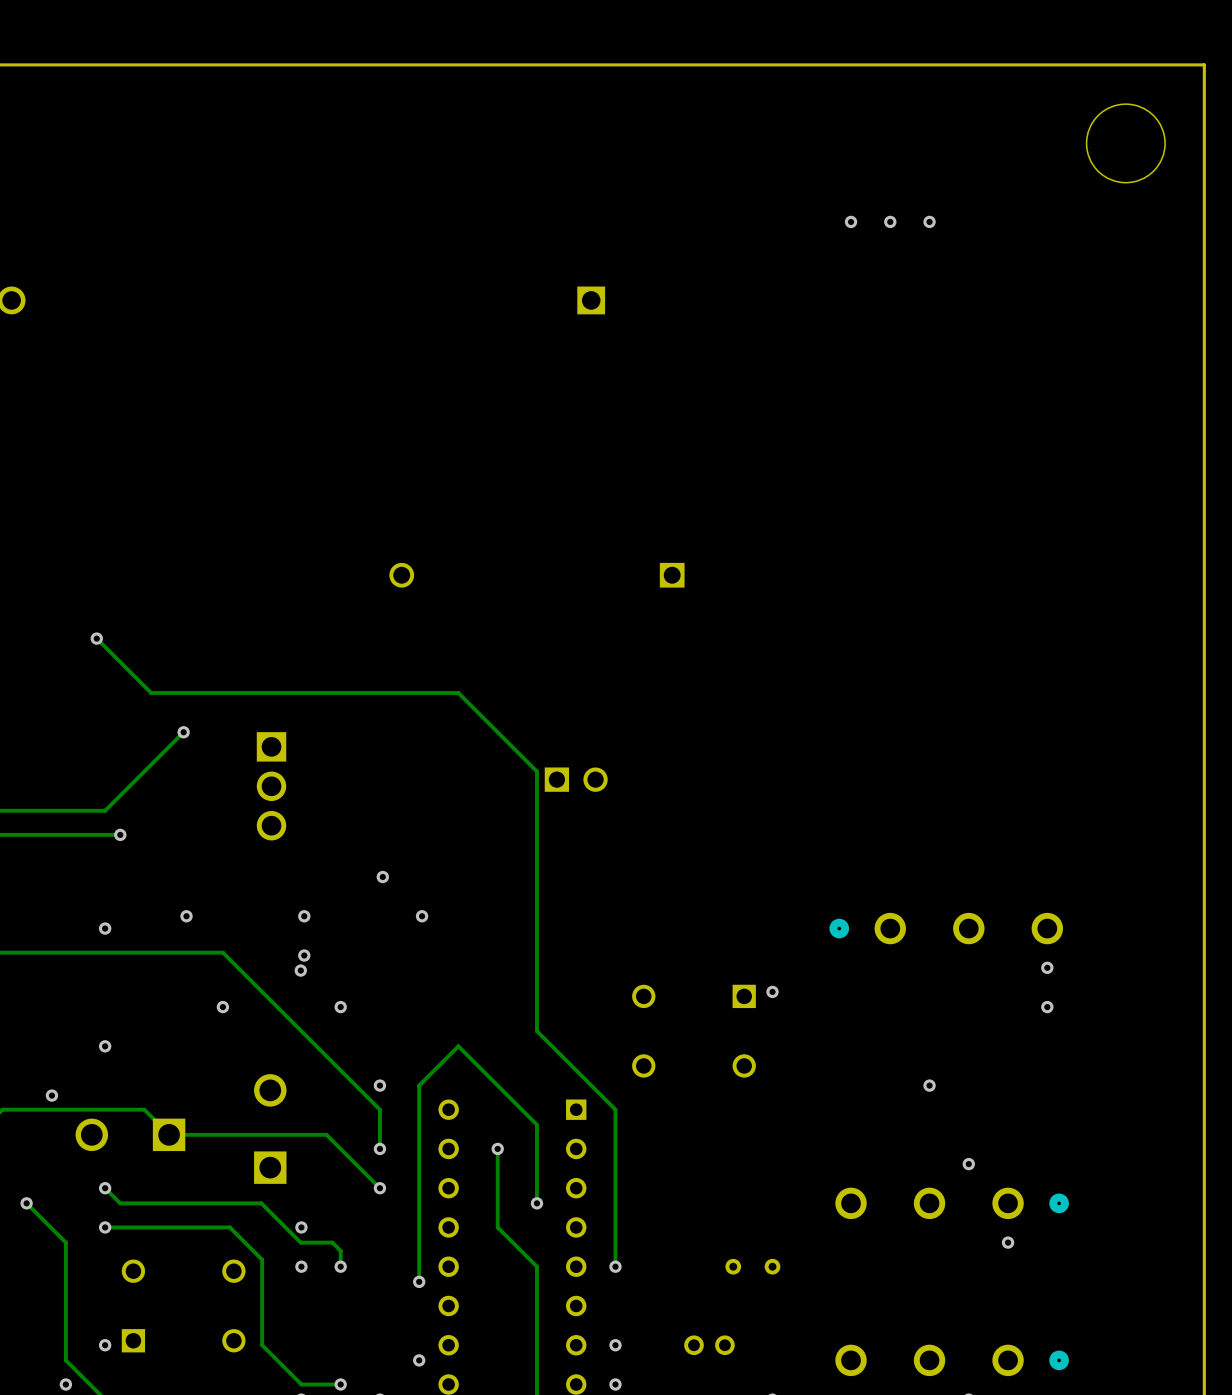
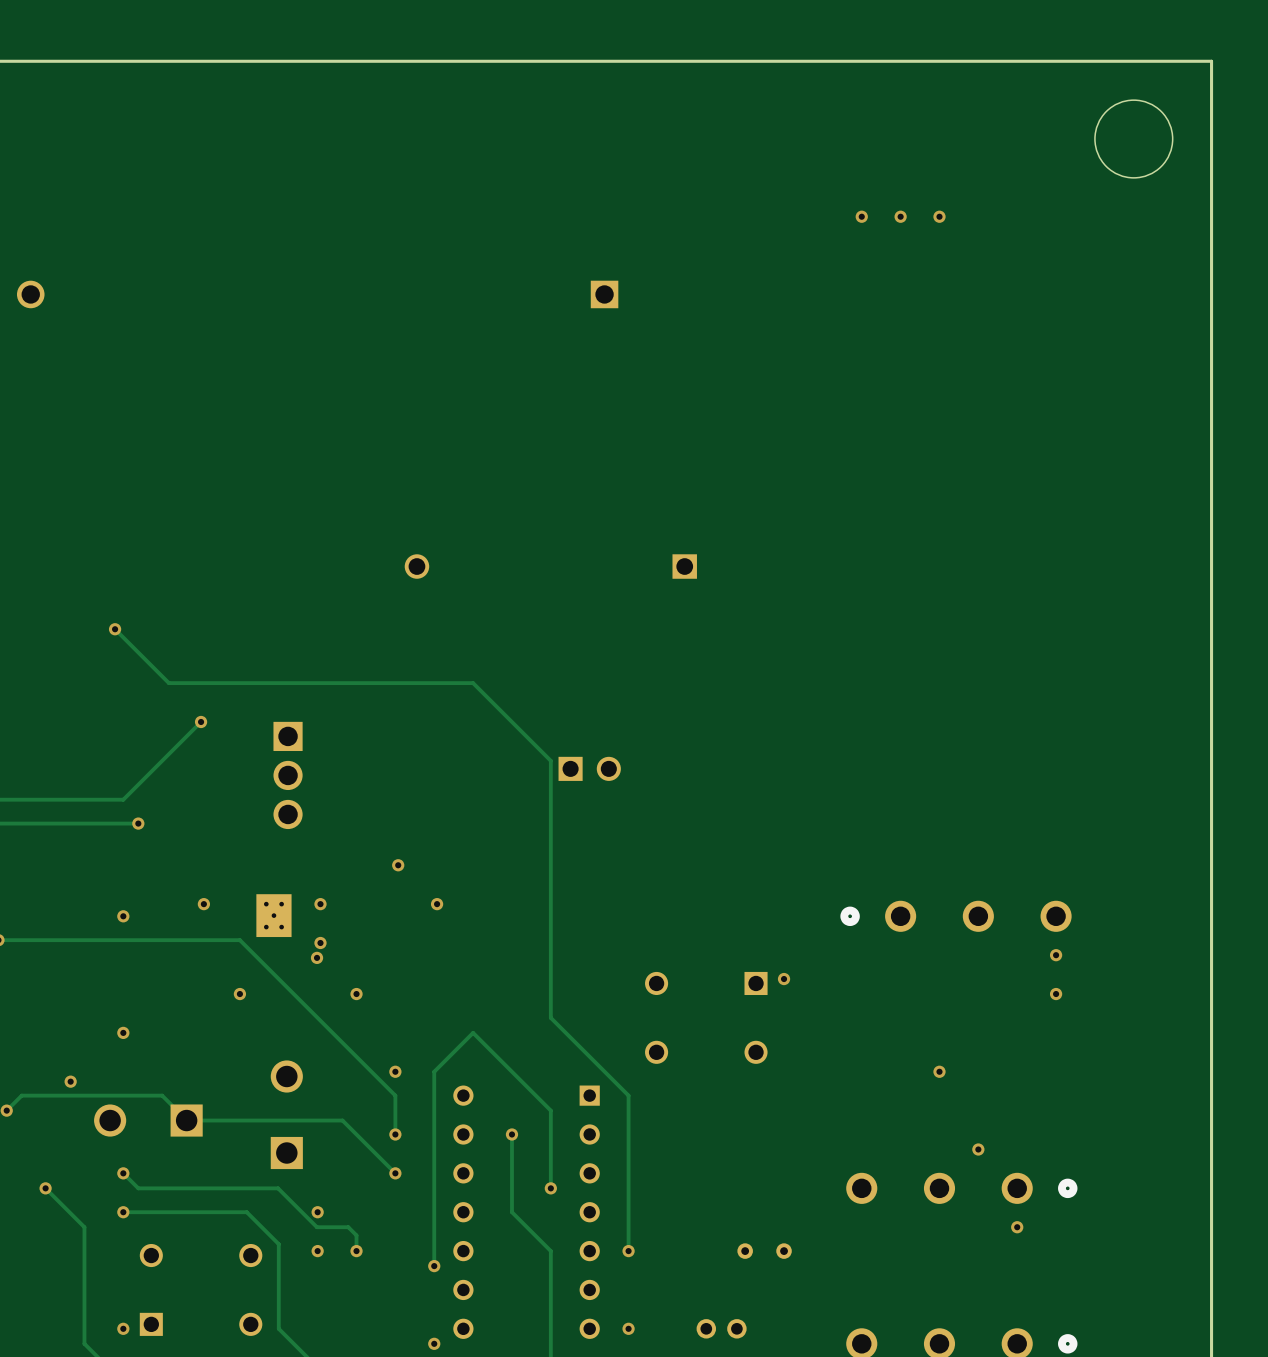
part: none -> (273, 915)

